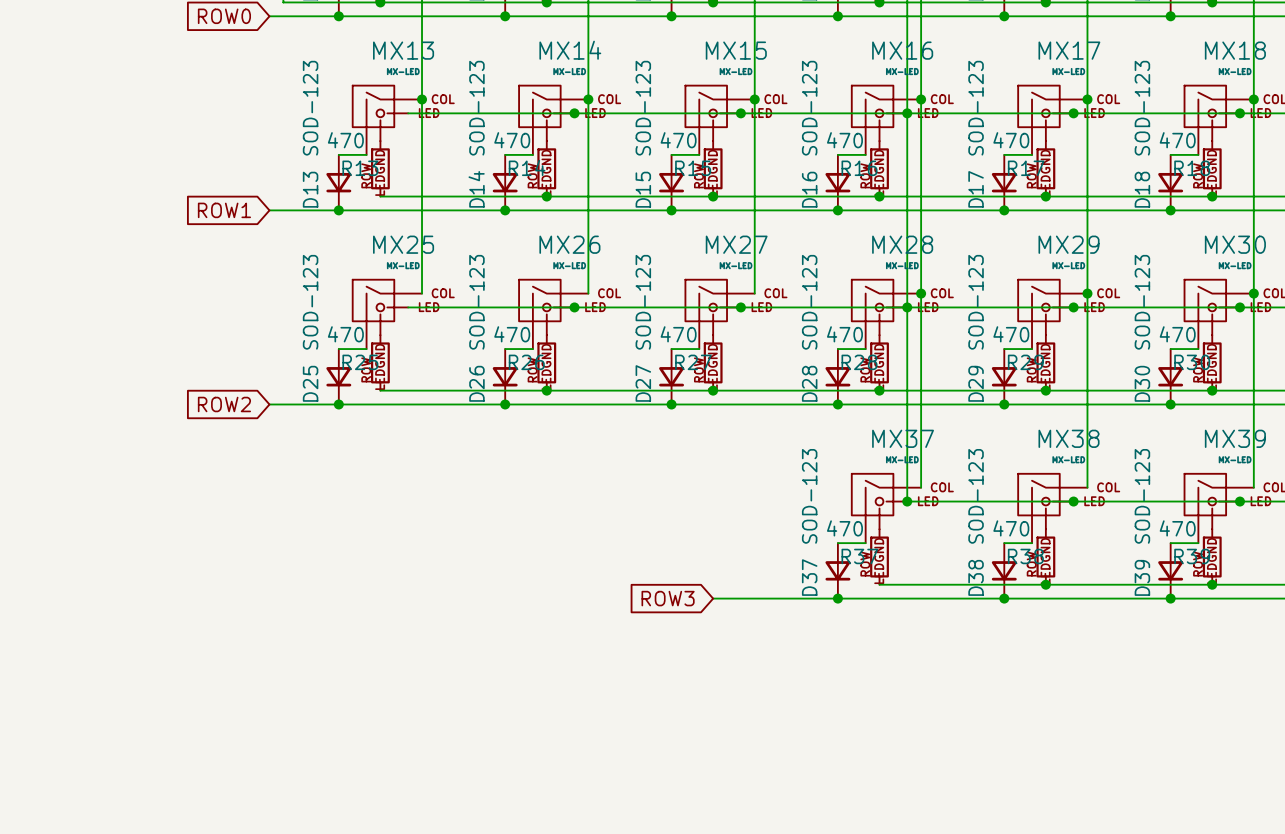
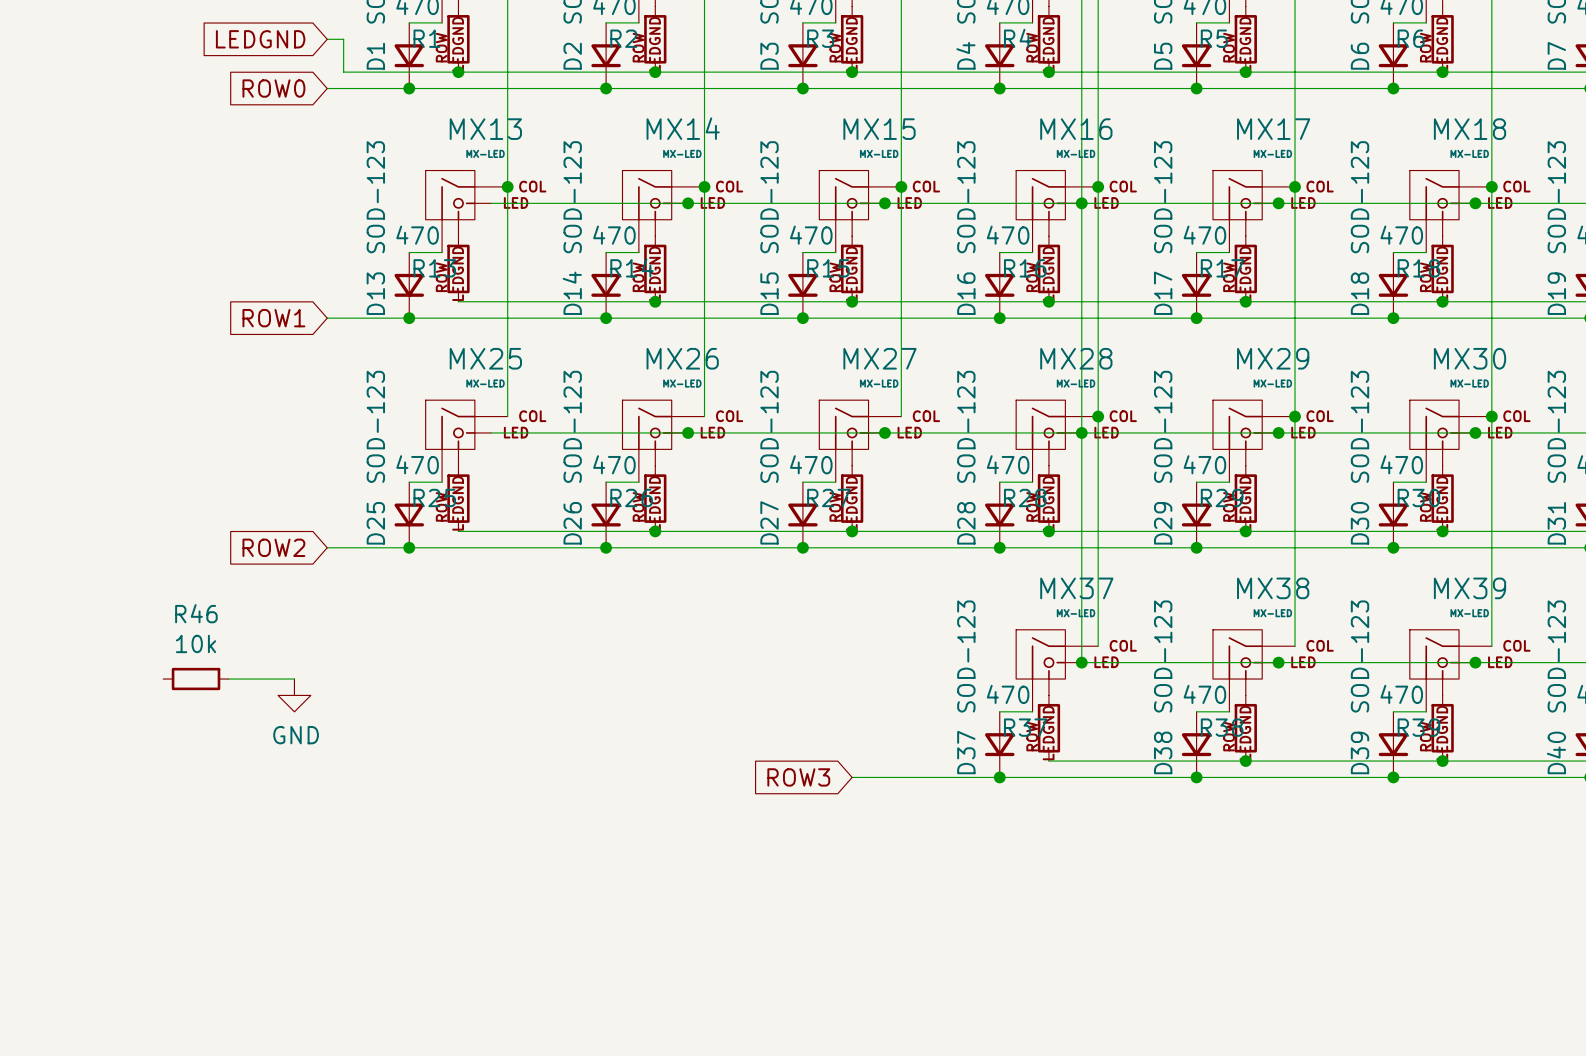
R46: none -> 10k (196, 679)
wire: none -> (228, 679) (294, 679)
power symbol: none -> GND (294, 695)

